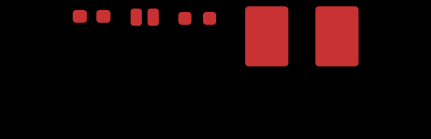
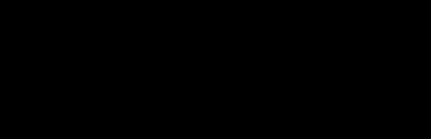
part: (91, 16) -> none
part: (144, 17) -> none
part: (197, 18) -> none
part: (301, 36) -> none

